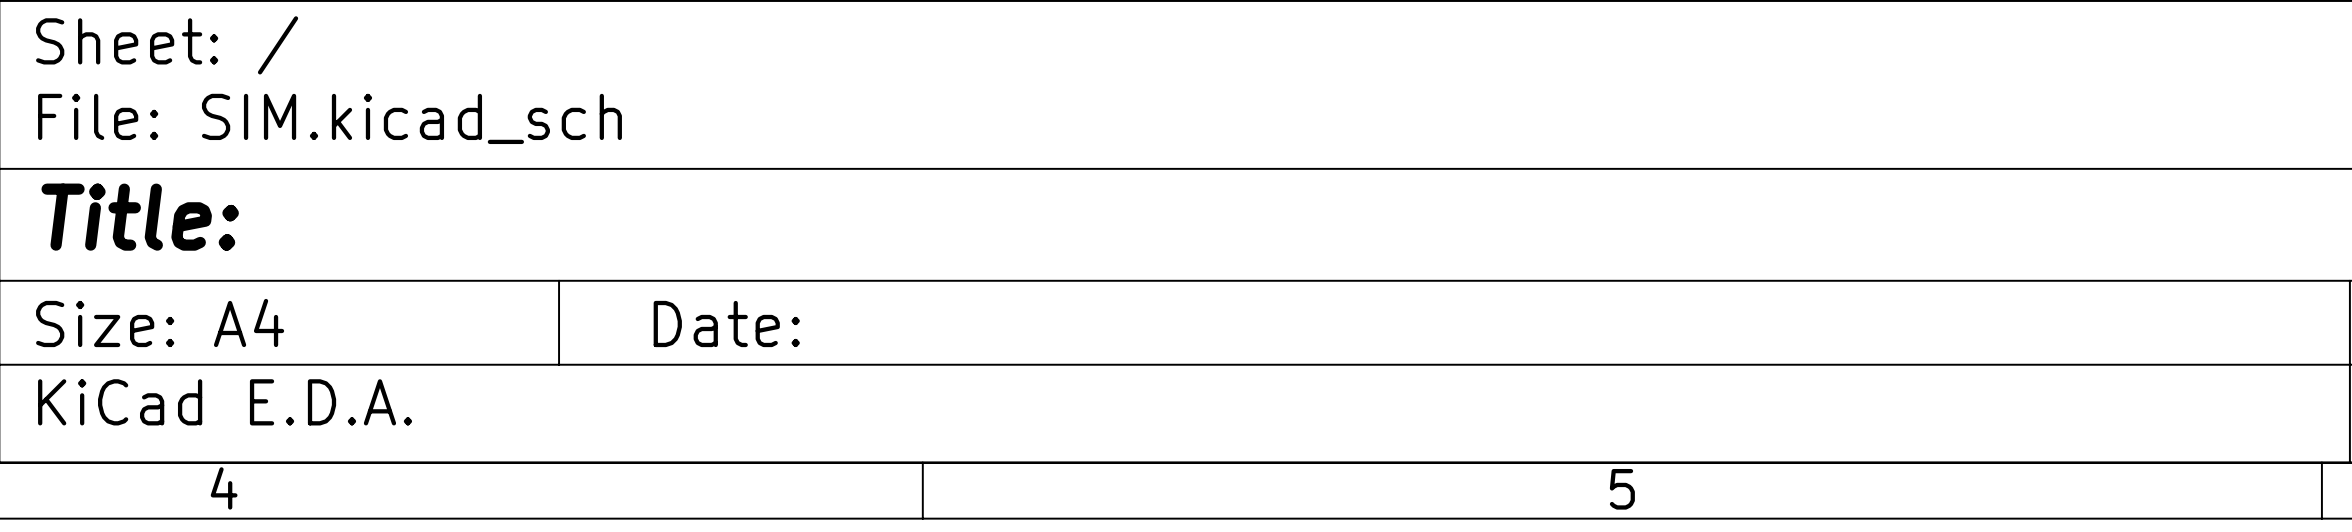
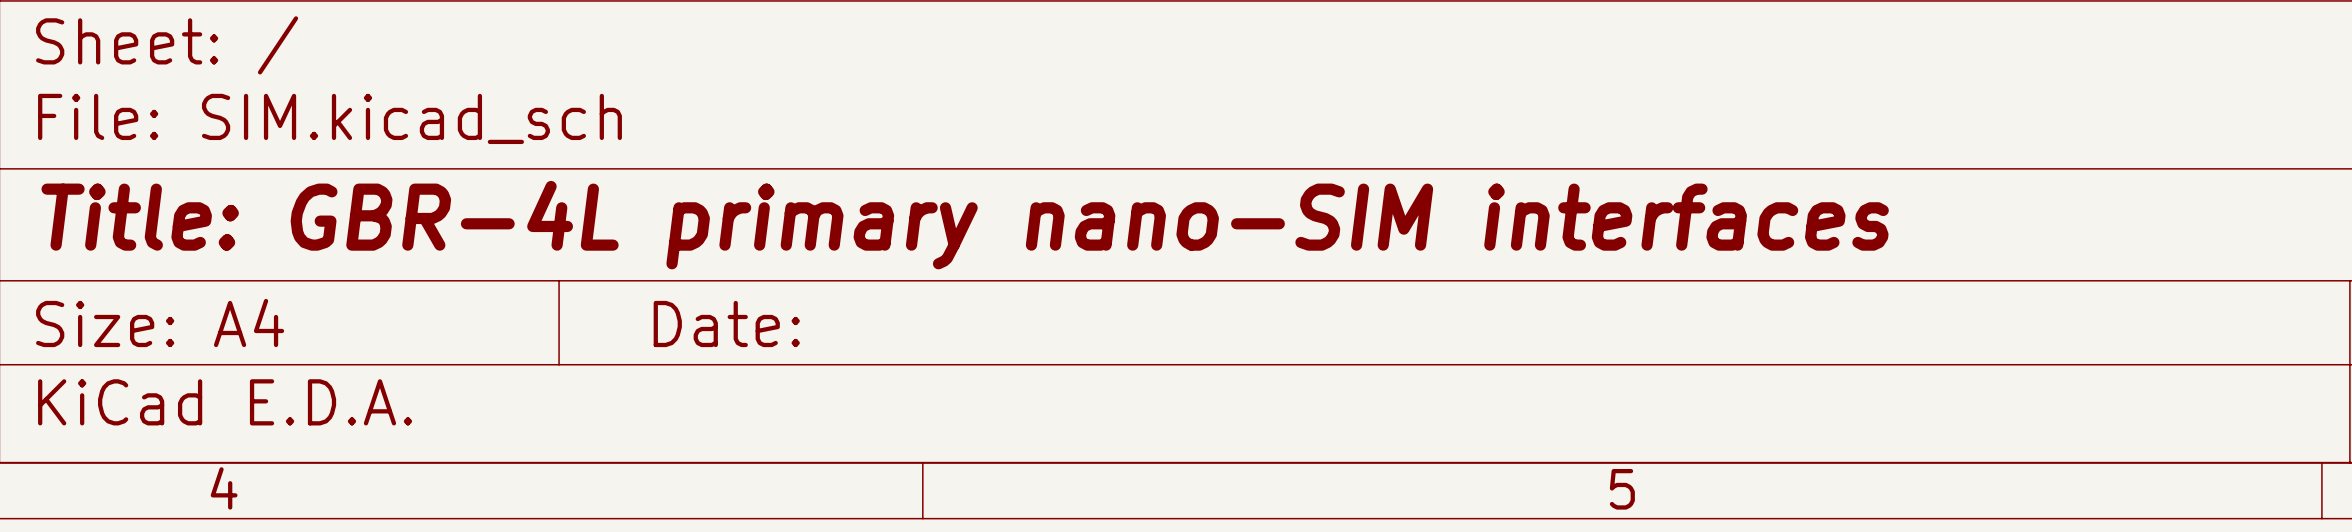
title block: Title: (140, 217) -> Title: GBR-4L primary nano-SIM interfaces (965, 225)

